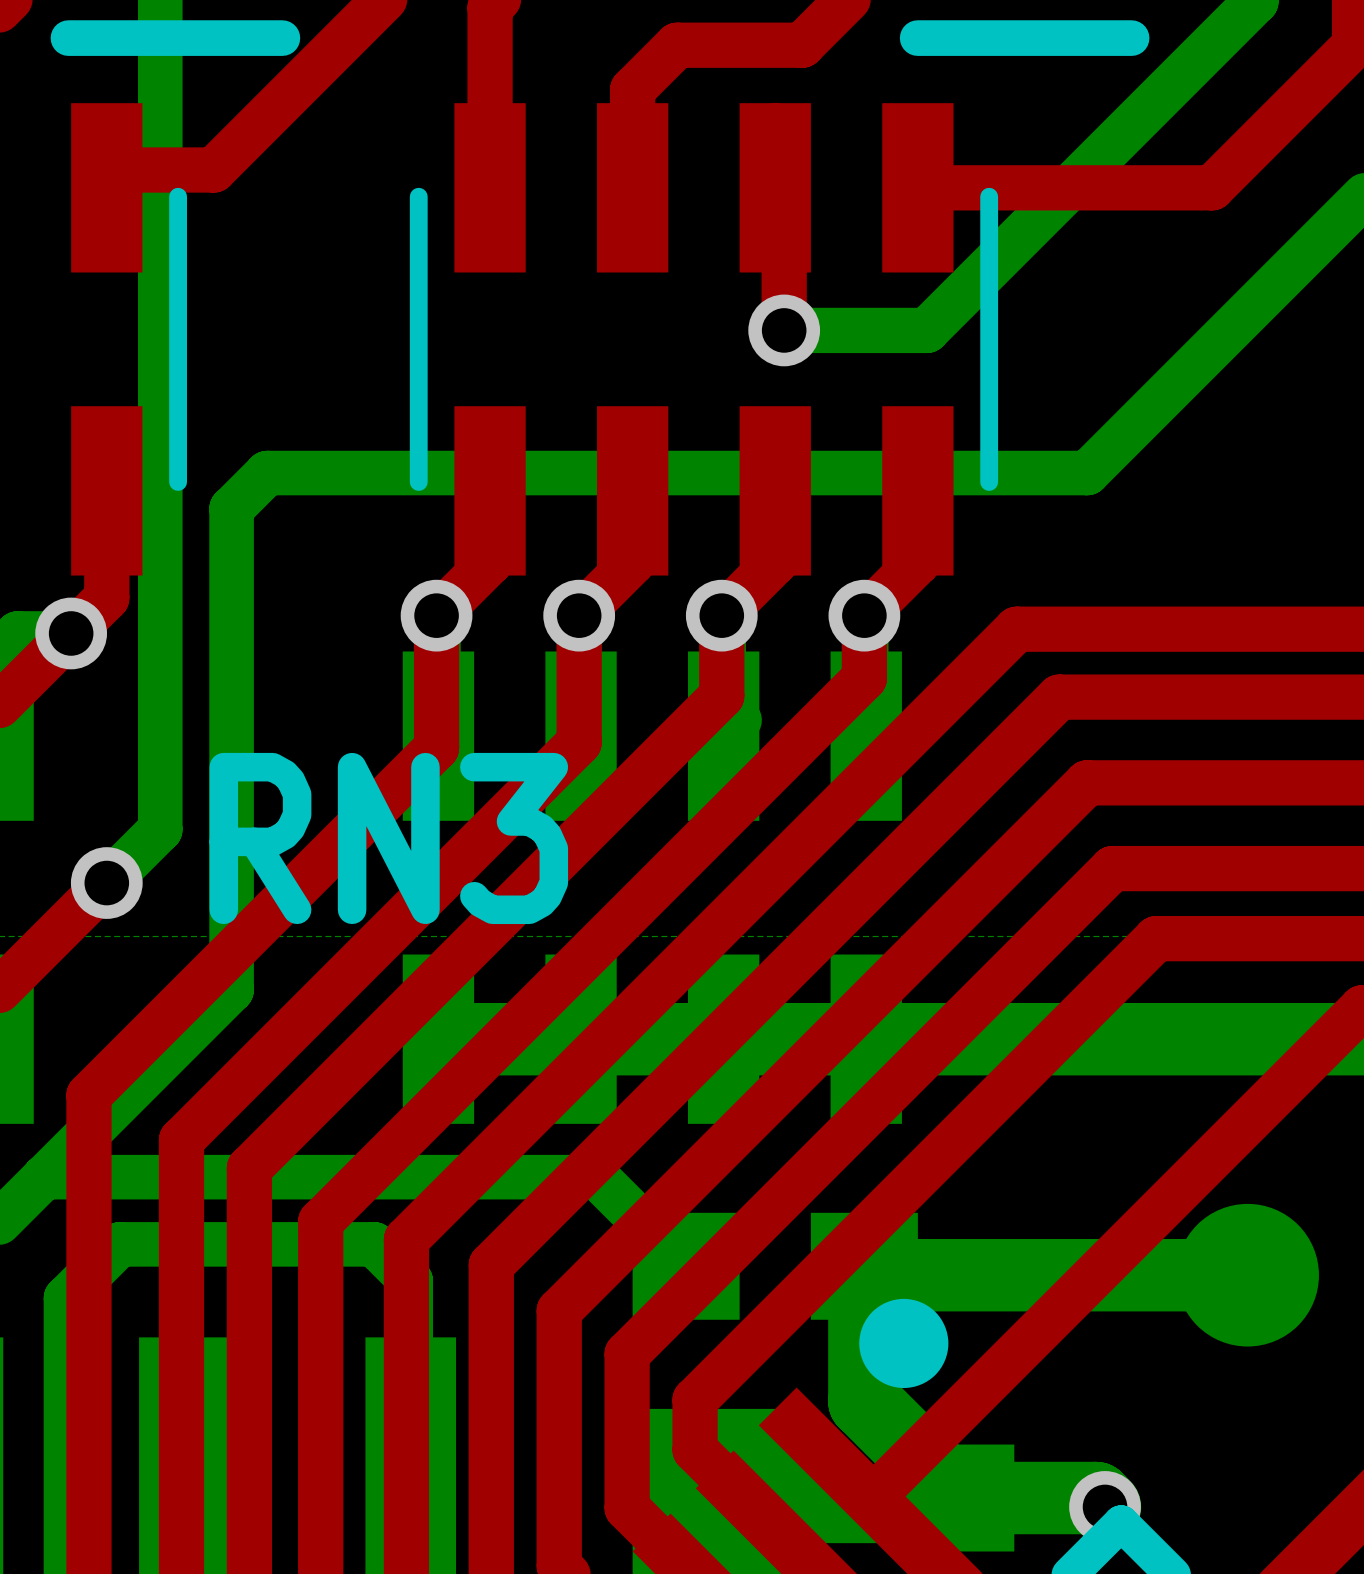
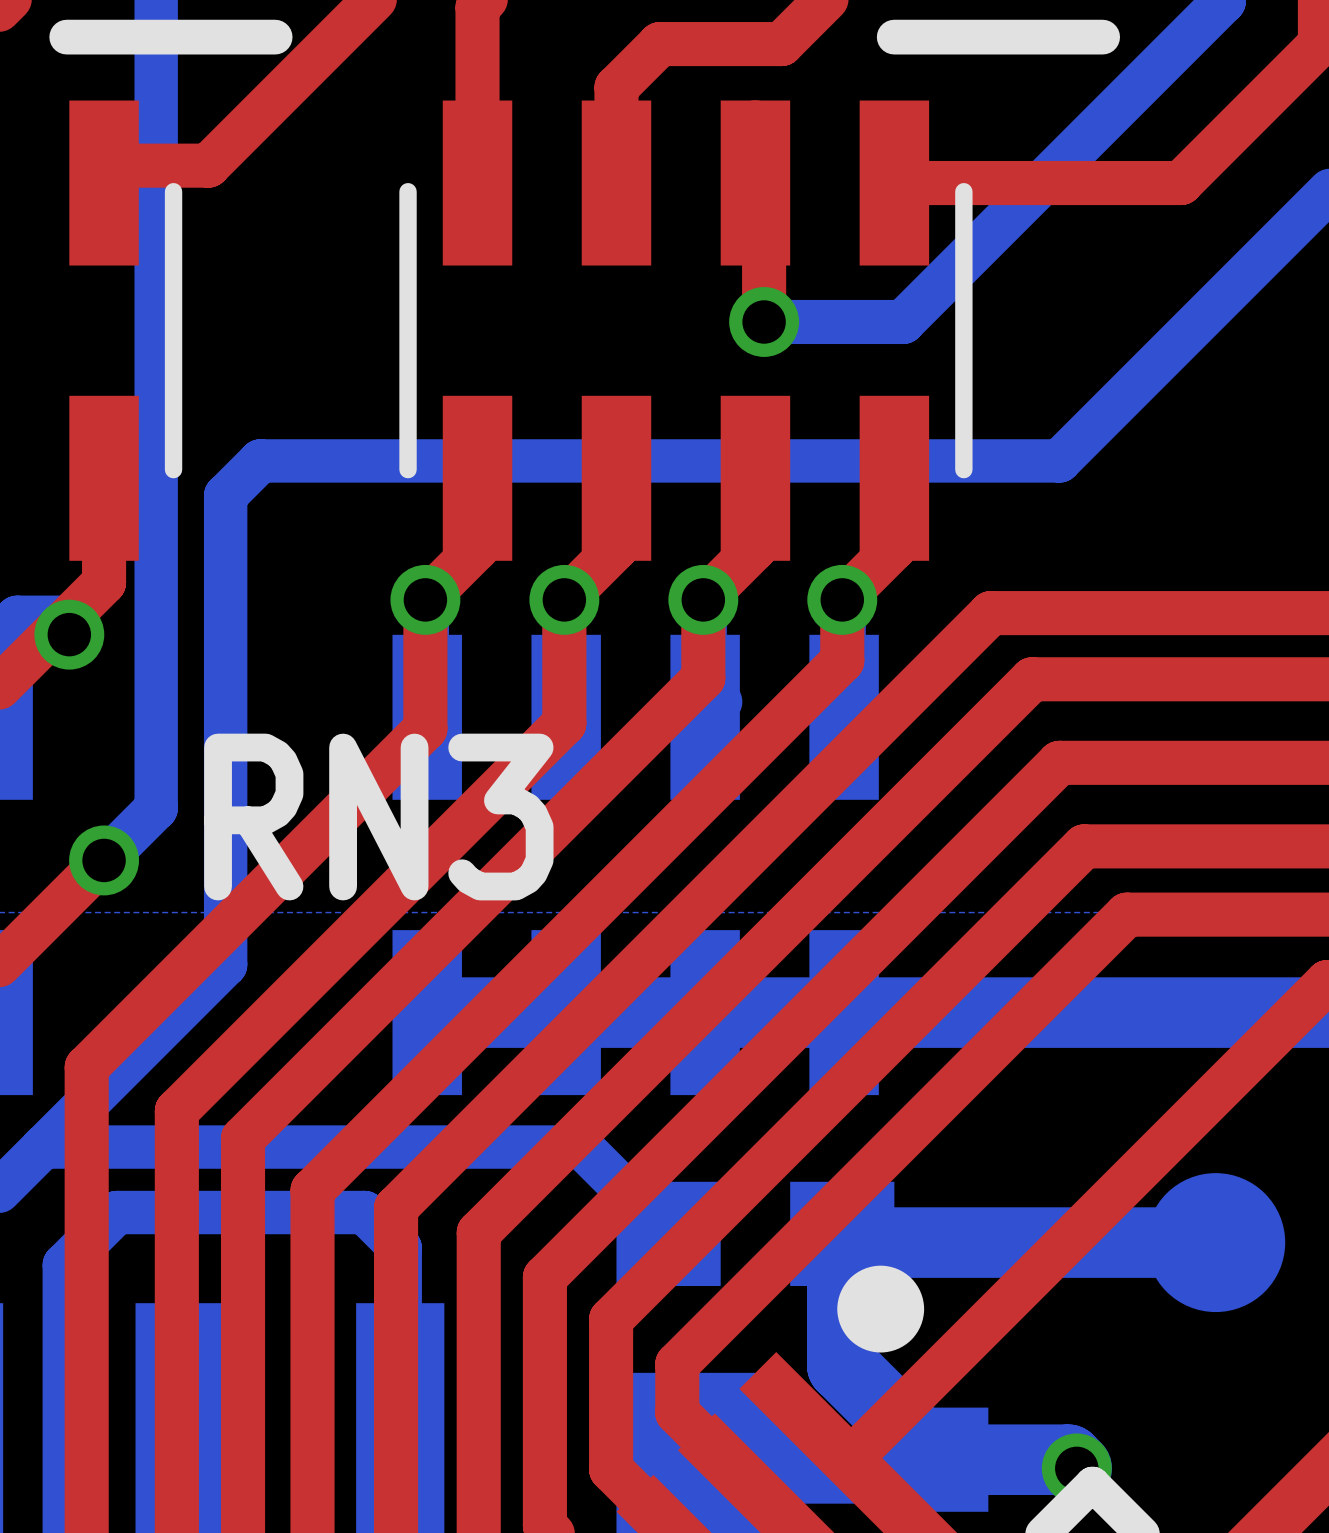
via position: (71, 633) -> (69, 634)

